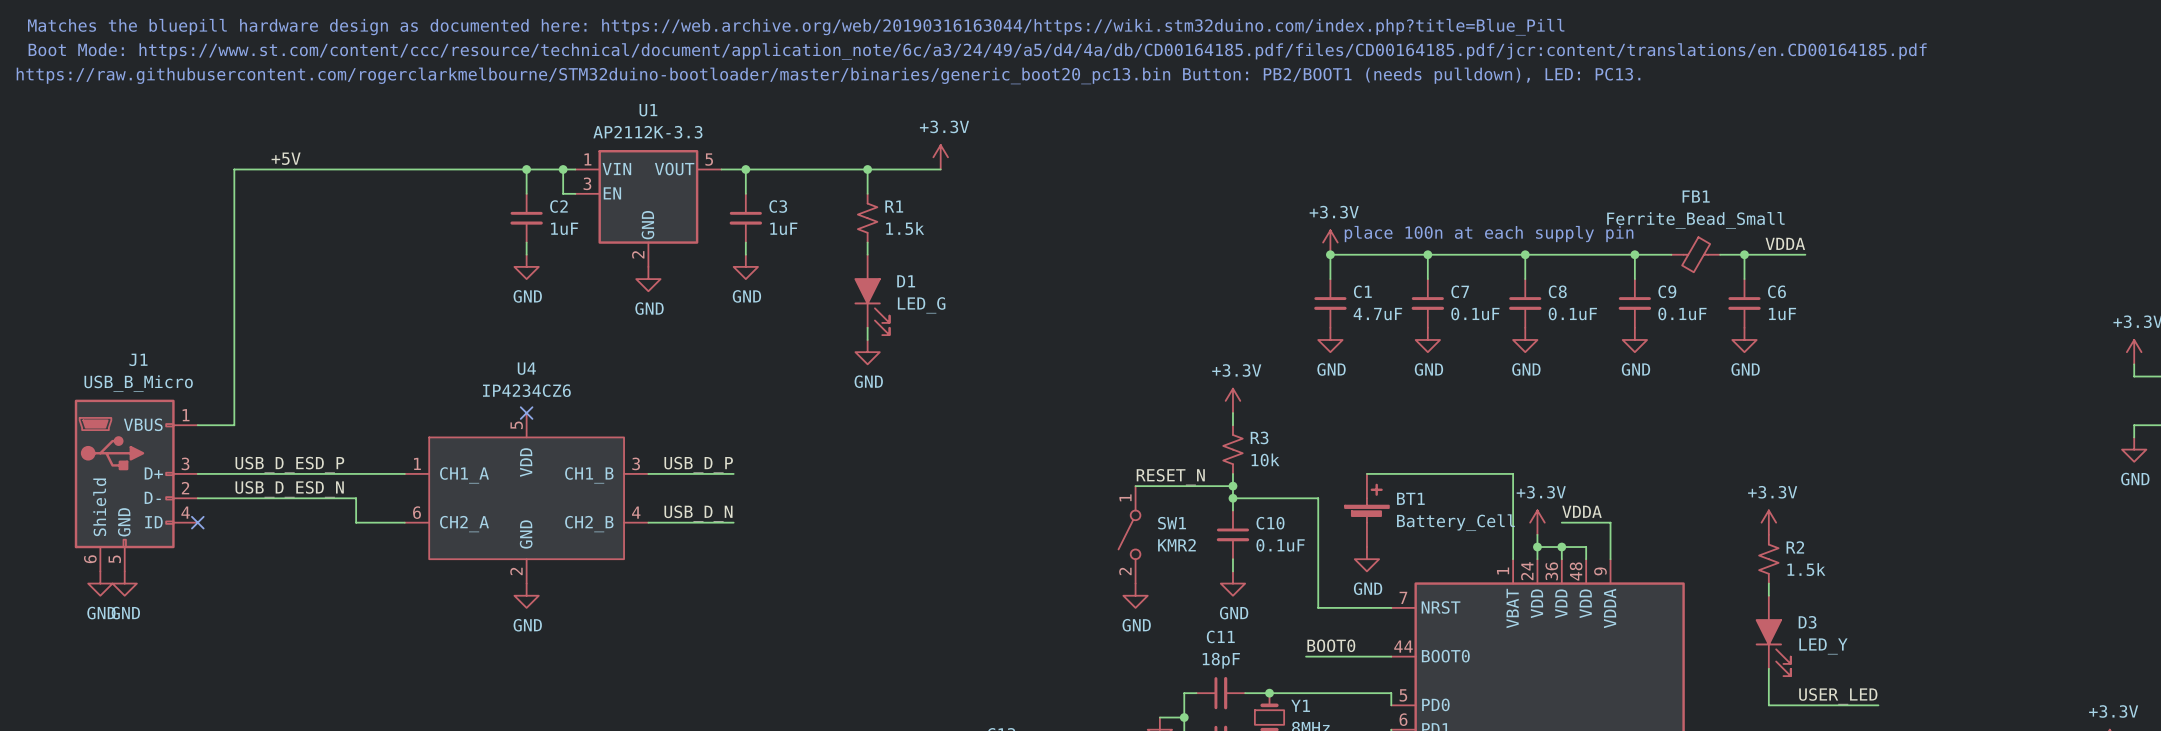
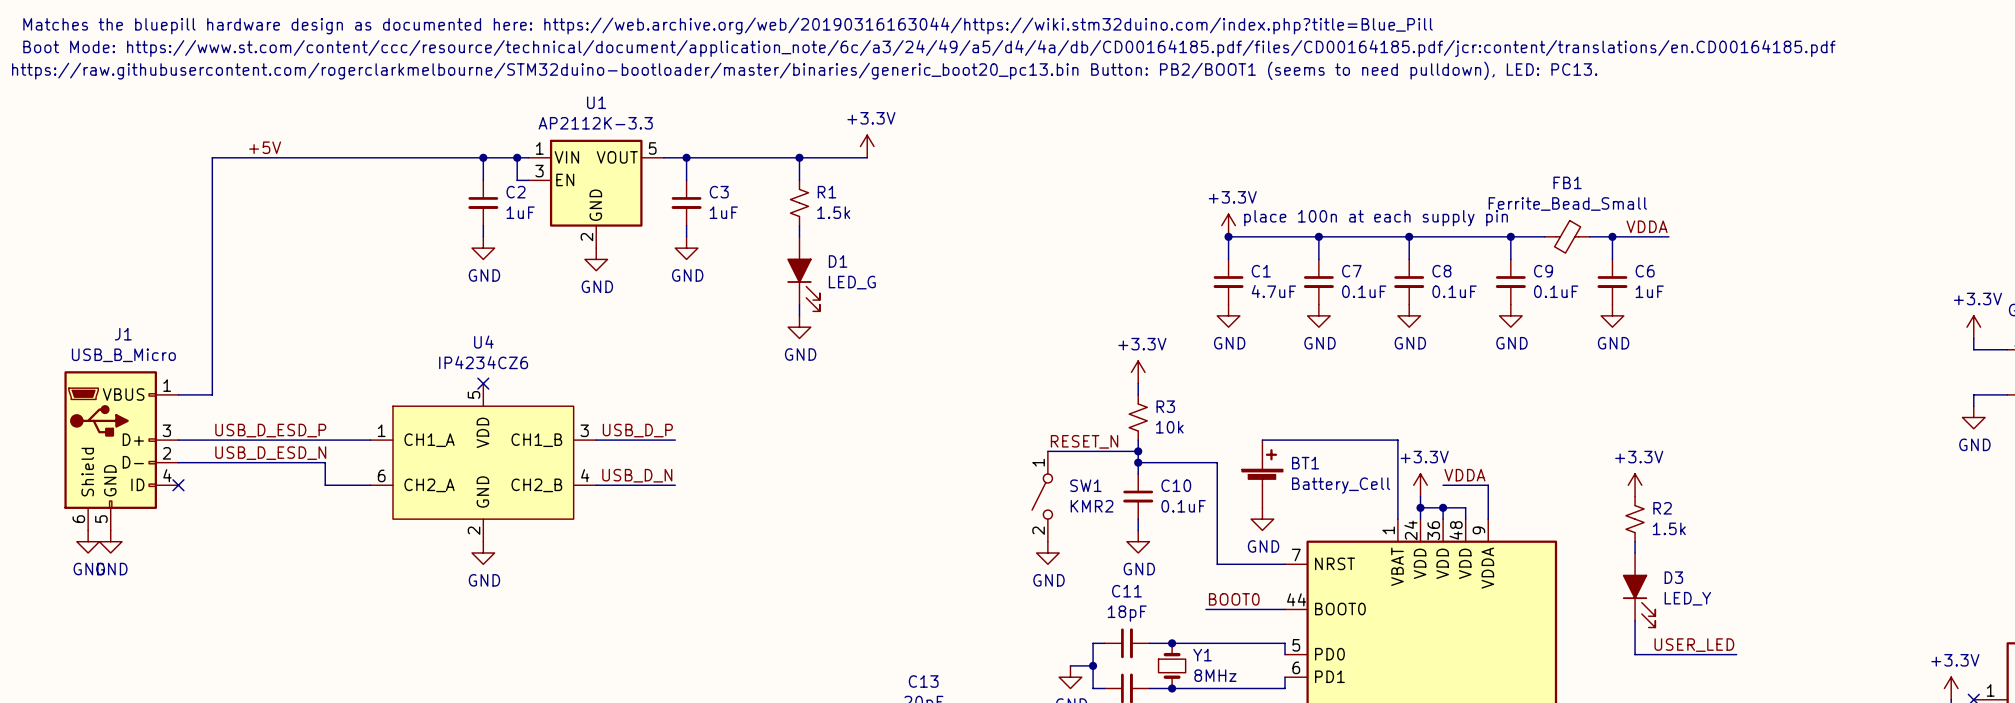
text: https://raw.githubusercontent.com/rogerclarkmelbourne/STM32duino-bootloader/master/binaries/generic_boot20_pc13.bin Button: PB2/BOOT1 (needs pulldown), LED: PC13. (828, 75) -> https://raw.githubusercontent.com/rogerclarkmelbourne/STM32duino-bootloader/master/binaries/generic_boot20_pc13.bin Button: PB2/BOOT1 (seems to need pulldown), LED: PC13. (804, 70)

